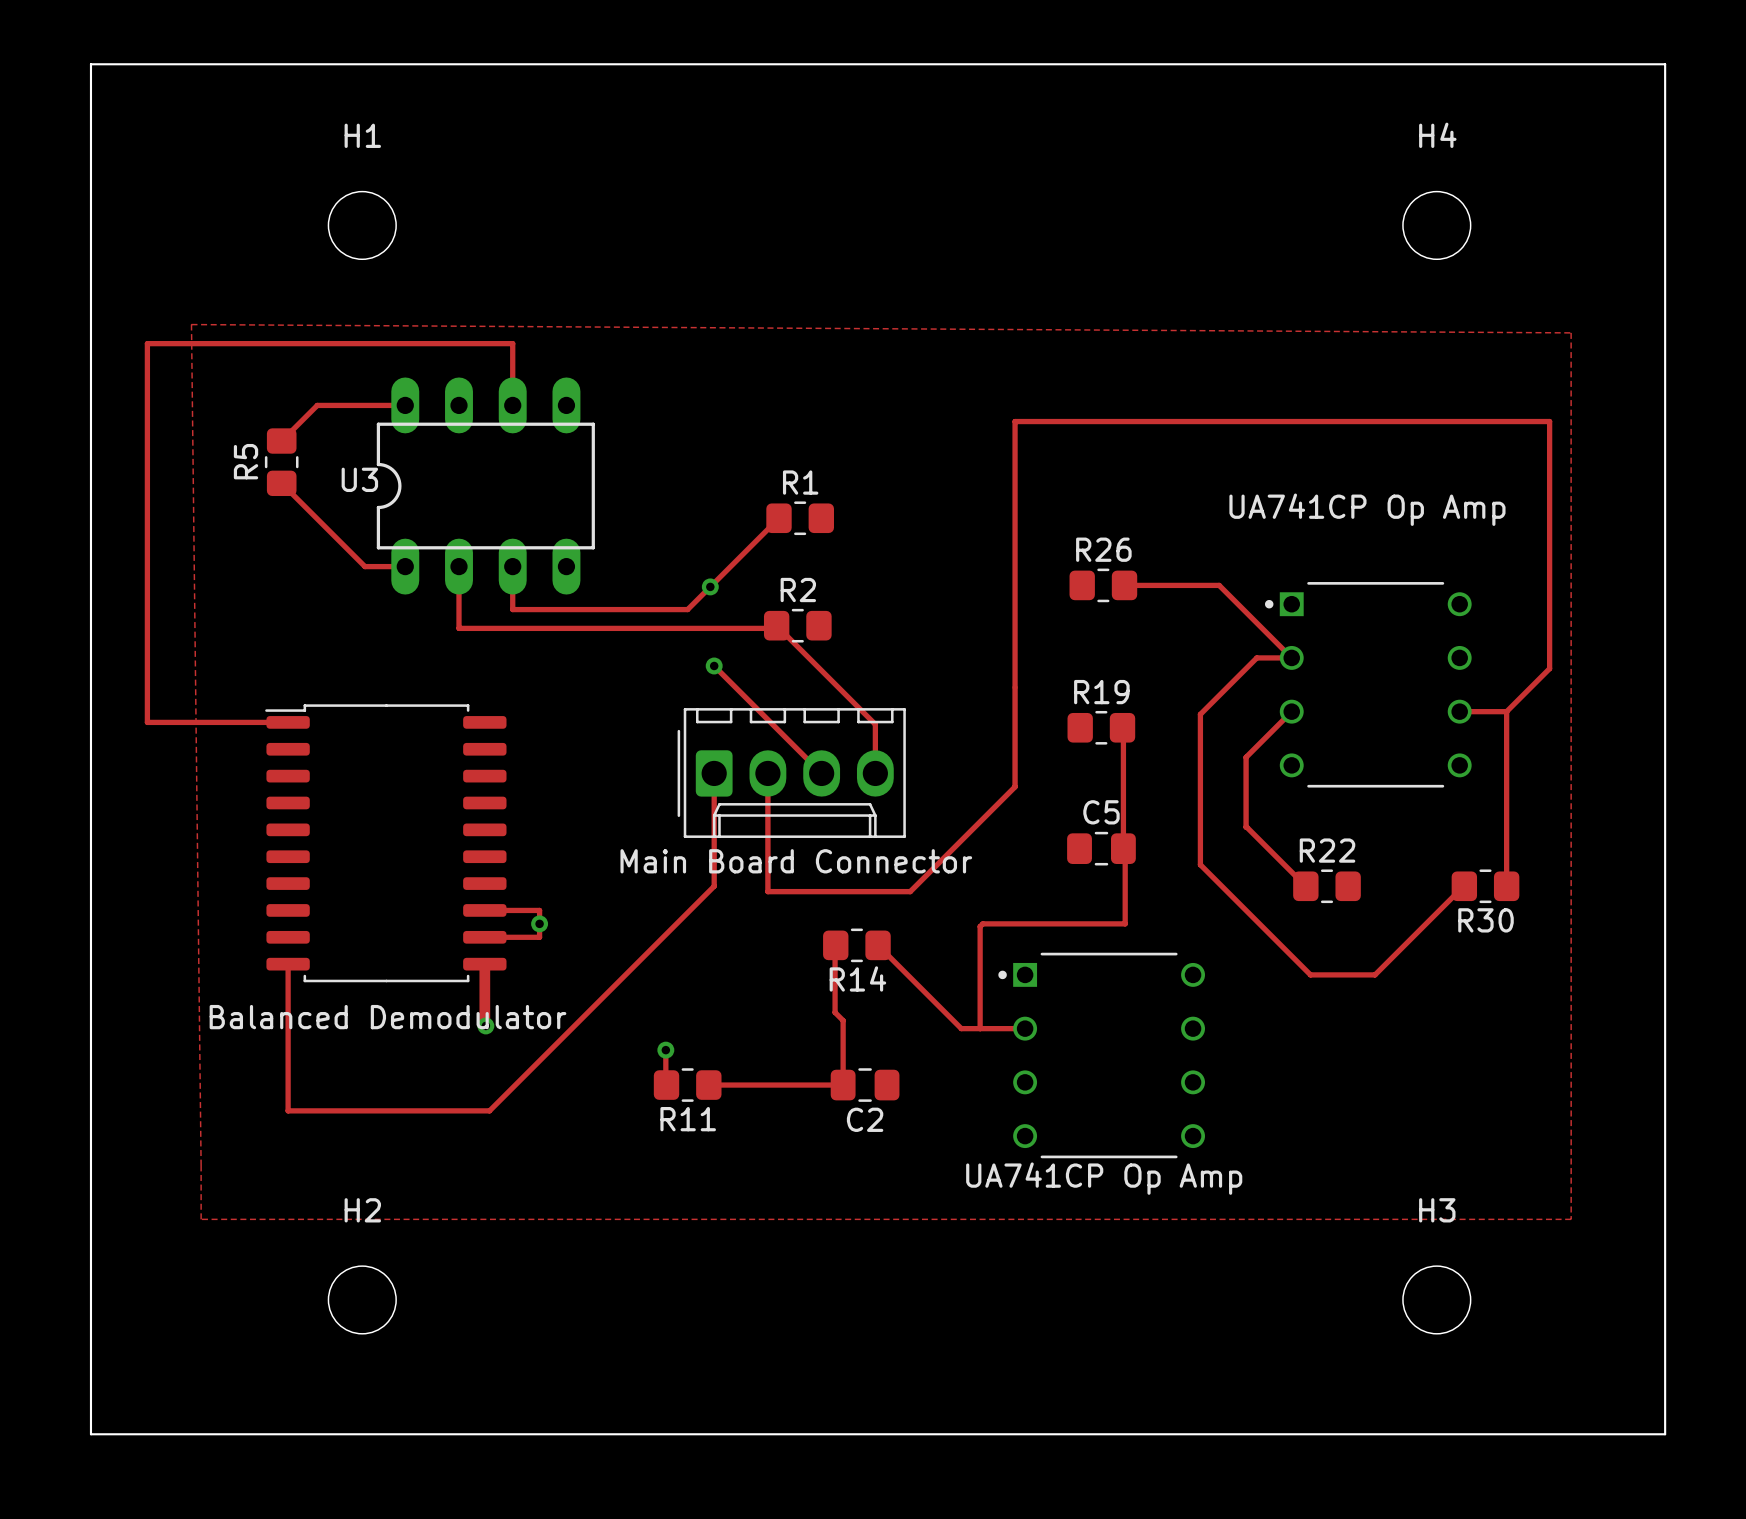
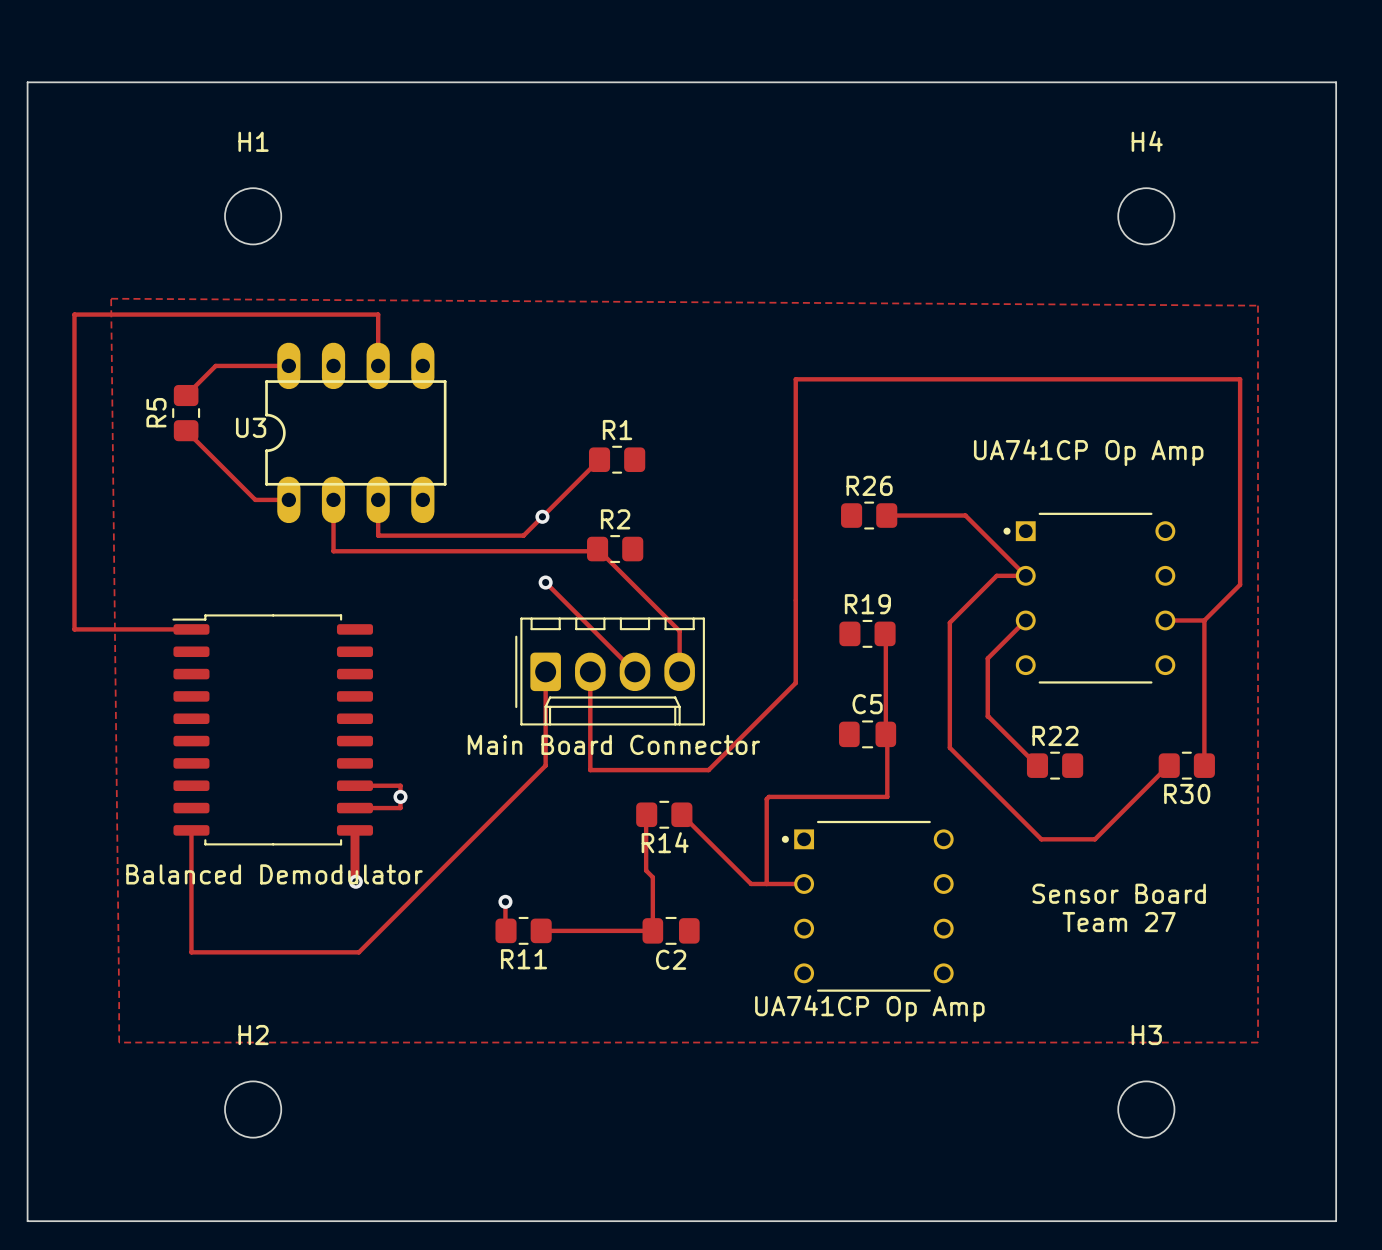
text: none -> Sensor Board (1119, 893)
text: none -> Team 27 (1119, 922)

